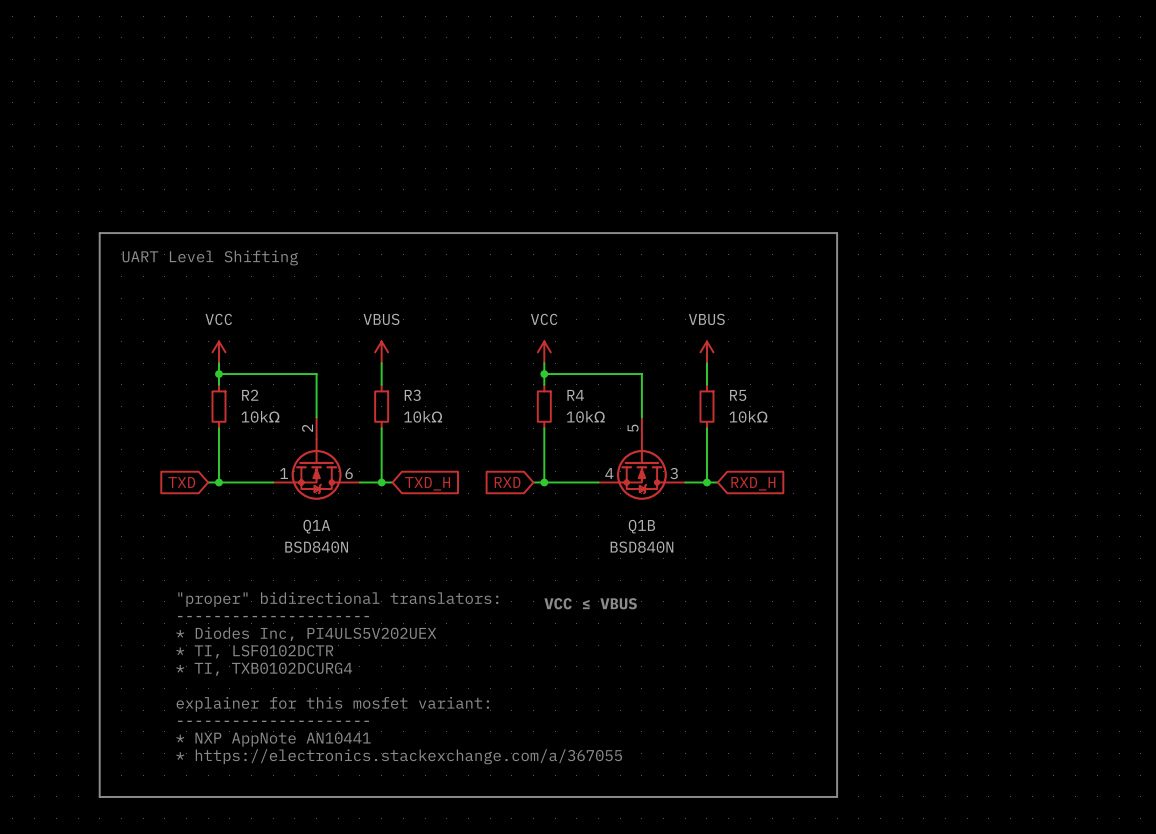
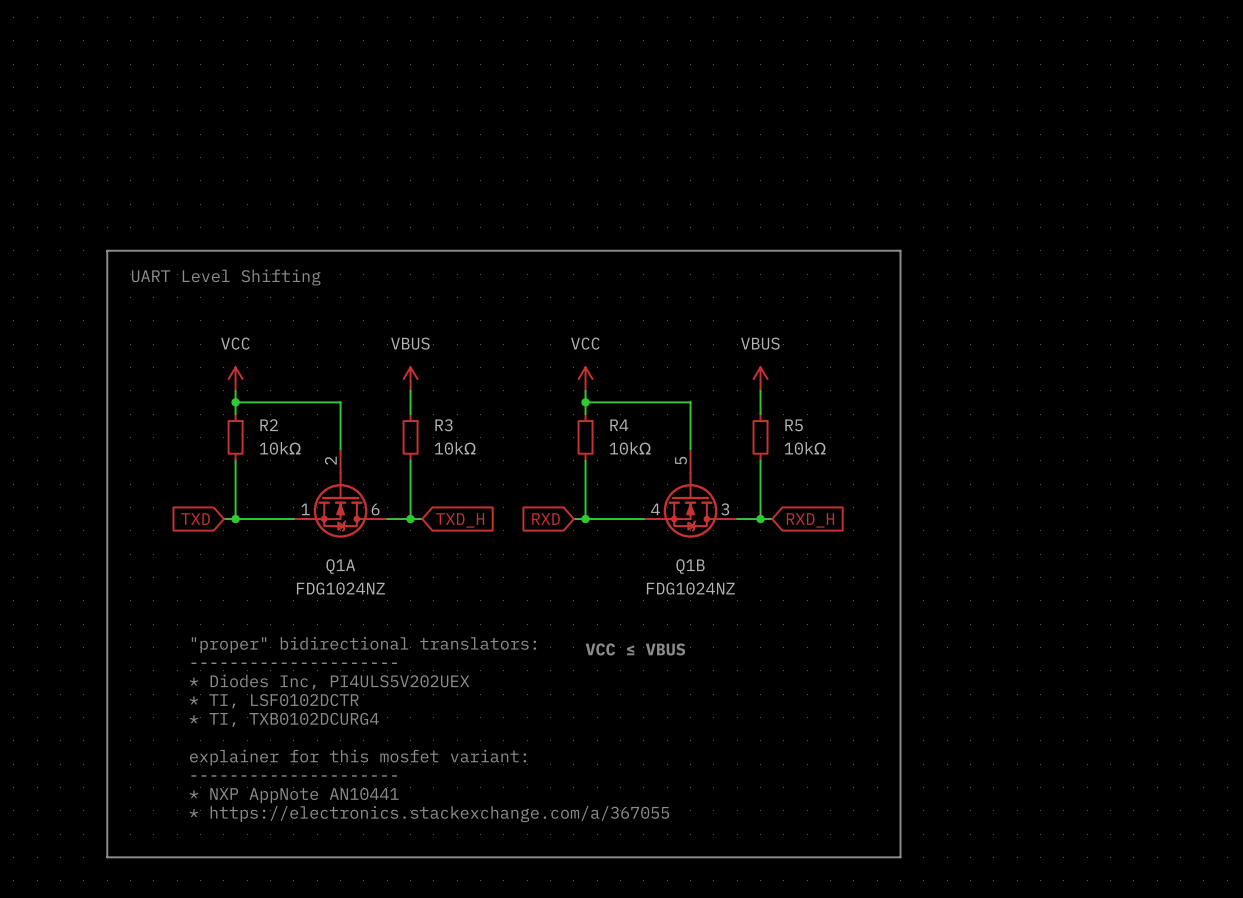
Q1A value: BSD840N (316, 547) -> FDG1024NZ (340, 588)
Q1B value: BSD840N (641, 547) -> FDG1024NZ (690, 588)

